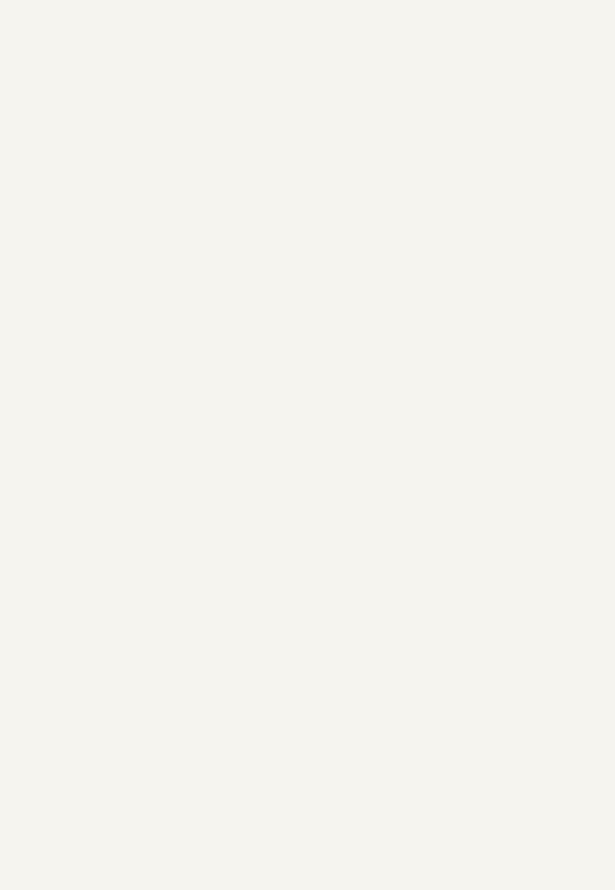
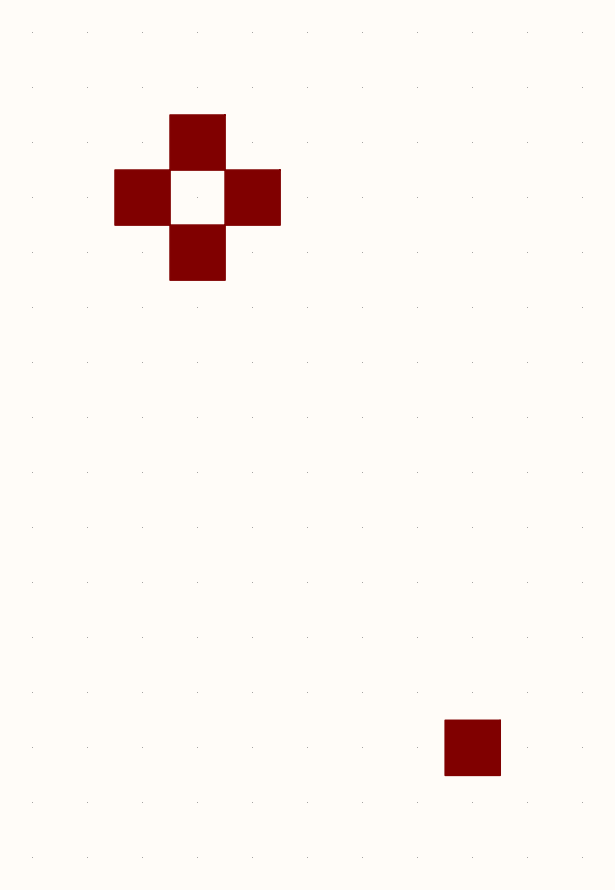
power symbol: none -> (197, 142)
power symbol: none -> (142, 197)
power symbol: none -> (252, 197)
power symbol: none -> (197, 252)
power symbol: none -> (472, 747)

